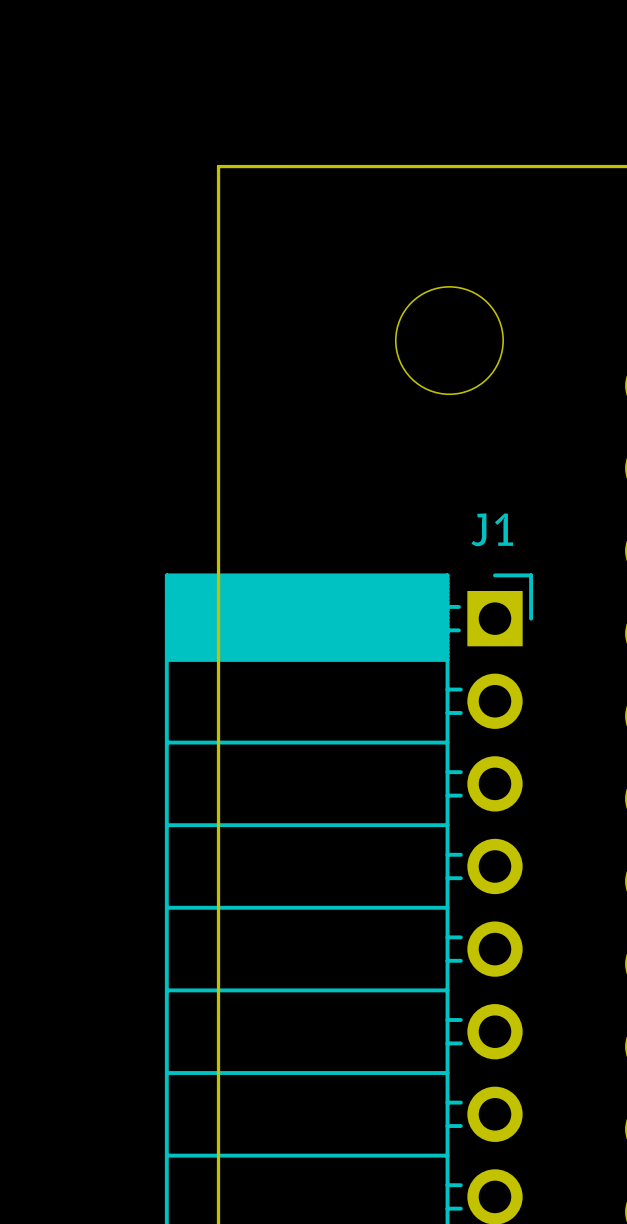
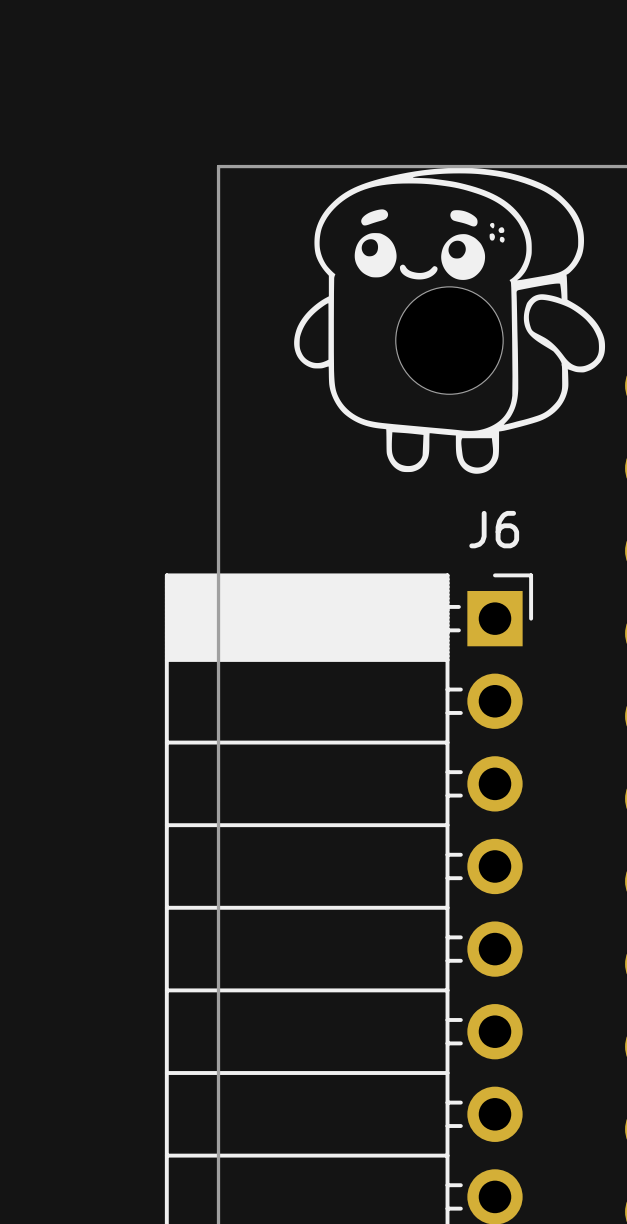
drawing: none -> [294, 167, 606, 474]
J1 name: J1 (492, 529) -> J6 (494, 529)

